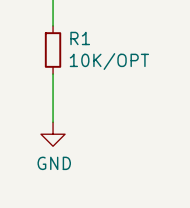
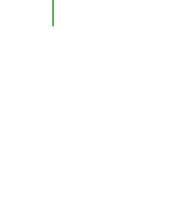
R1: 10K/OPT (53, 50) -> none
wire: (53, 74) (53, 122) -> none
power symbol: GND (53, 134) -> none

